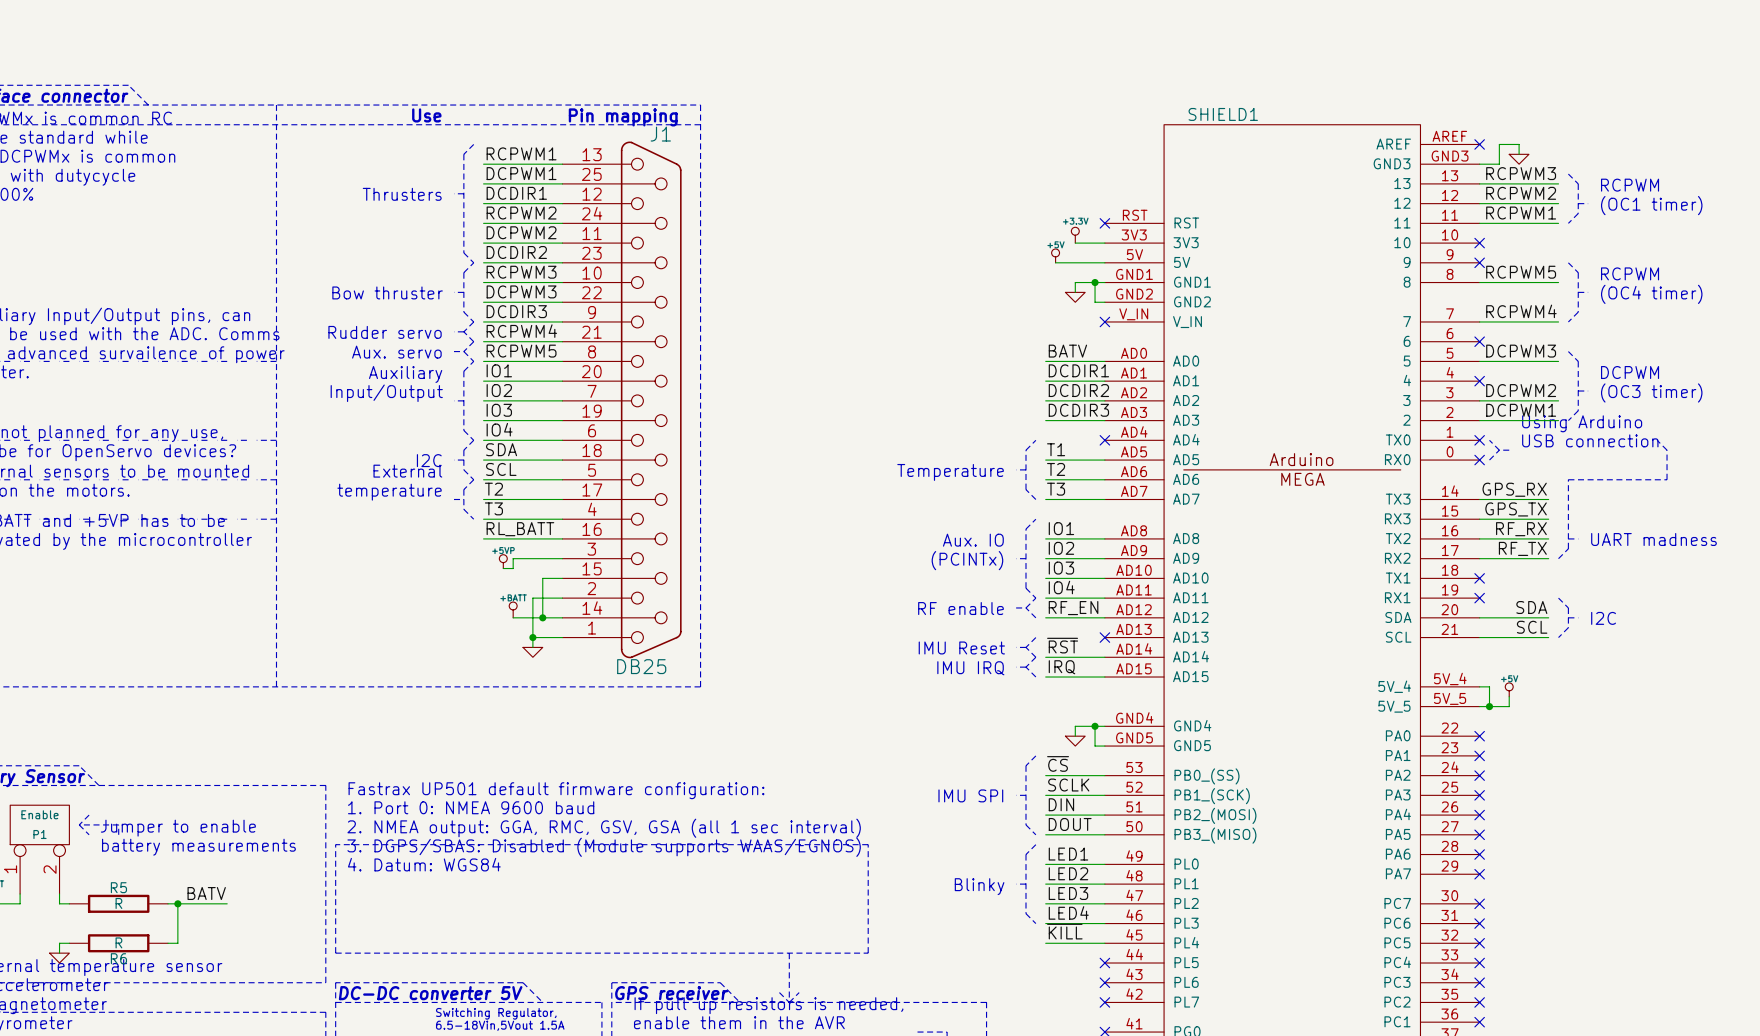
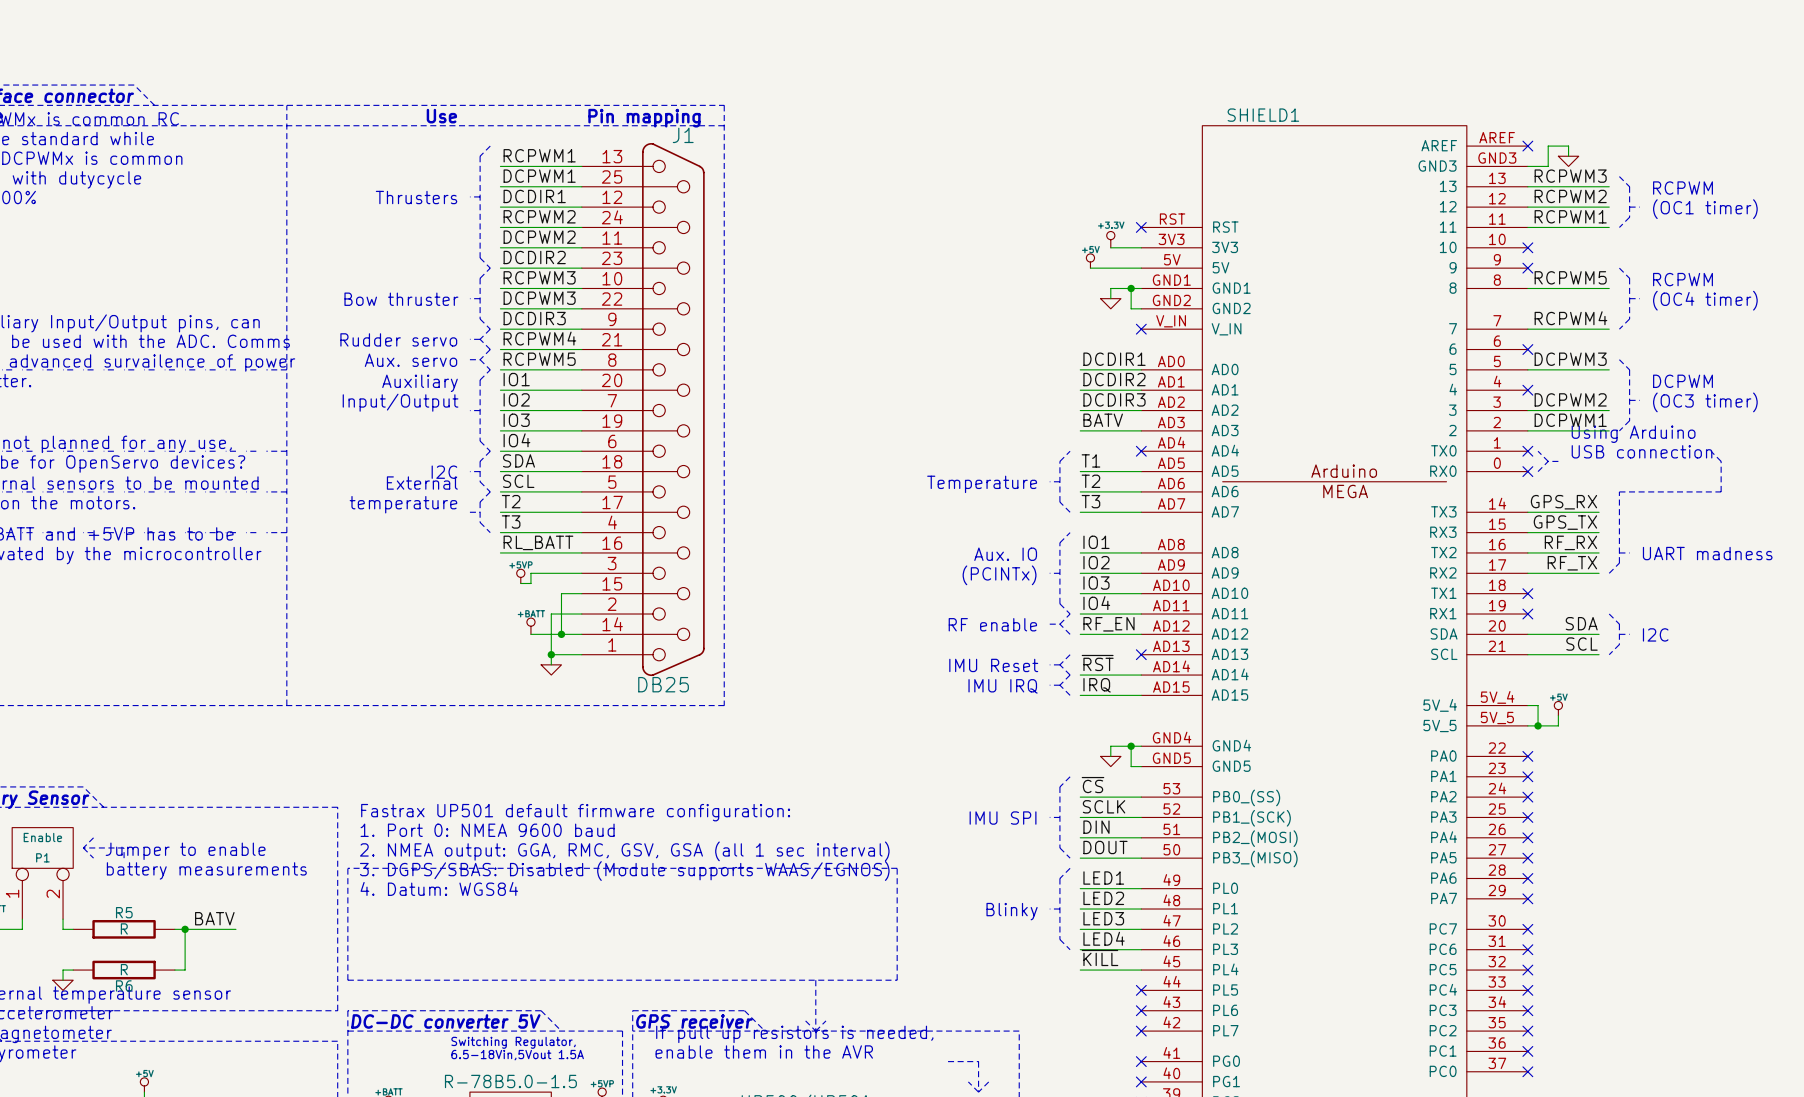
label: BATV (1067, 351) -> DCDIR1 (1114, 359)
label: DCDIR1 (1078, 370) -> DCDIR2 (1114, 379)
label: DCDIR2 (1078, 390) -> DCDIR3 (1114, 399)
label: DCDIR3 (1078, 410) -> BATV (1103, 420)

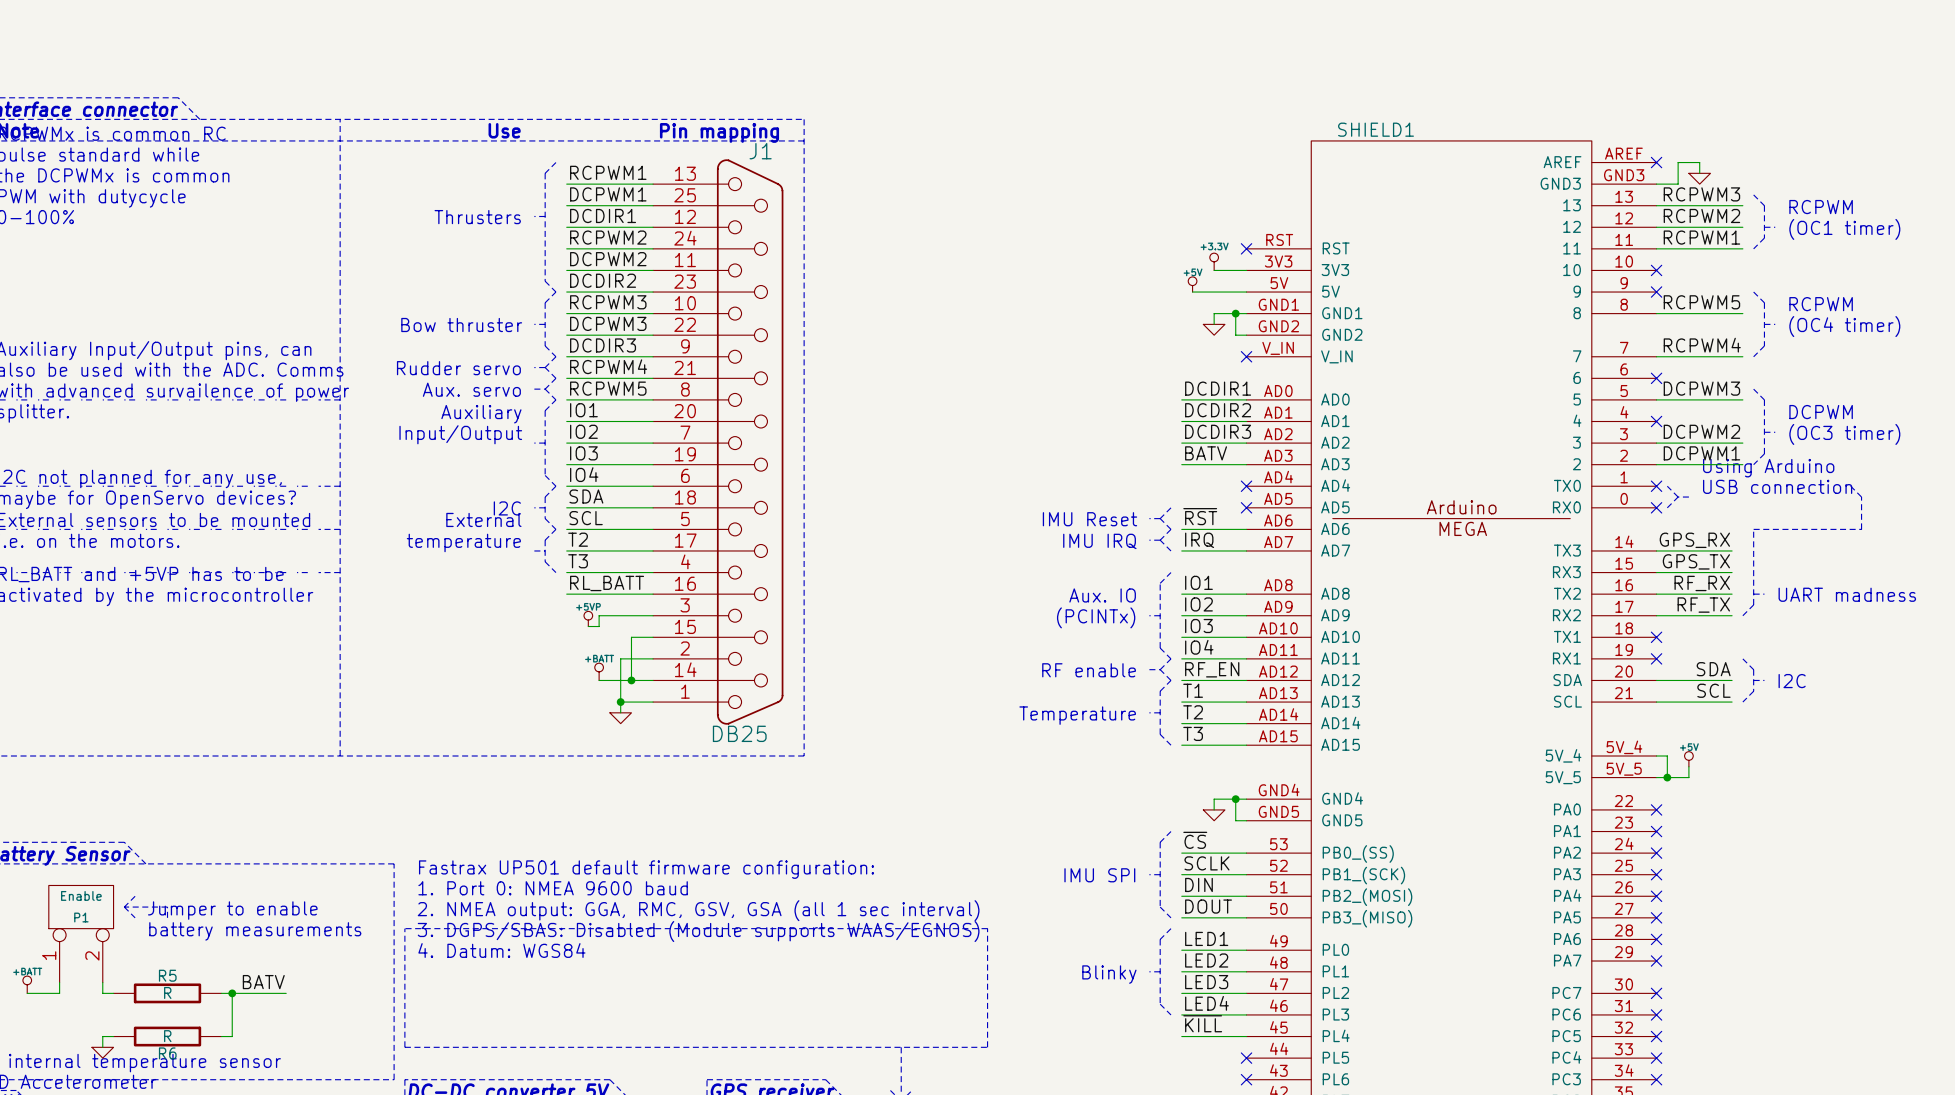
line: (1070, 451) (1059, 461) (1059, 502) -> (1170, 680) (1160, 691) (1160, 734)
label position: T1 (1090, 460) -> T1 (1193, 690)
wire: (1080, 471) (1141, 471) -> (1181, 702) (1246, 702)
no-connect mark: none -> (1246, 507)
label: T2 (1090, 481) -> ~{RST} (1200, 516)
text: Temperature (982, 484) -> IMU Reset (1089, 519)
label: T3 (1090, 501) -> IRQ (1199, 540)
line: (1070, 654) (1059, 664) (1070, 675) (1059, 685) (1049, 685) -> (1170, 507) (1160, 518) (1170, 529) (1160, 540) (1149, 540)
no-connect mark: (1141, 654) -> none
label: ~{RST} (1097, 662) -> T2 (1193, 712)
text: IMU Reset (993, 665) -> Temperature (1077, 715)
label: IRQ (1097, 685) -> T3 (1193, 733)
text position: IMU IRQ (1003, 686) -> IMU IRQ (1099, 541)

